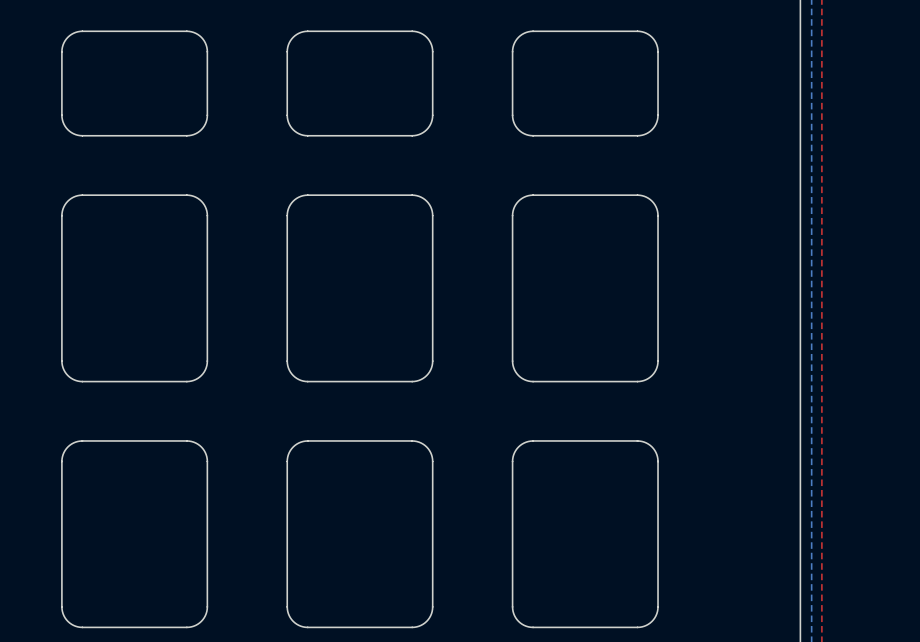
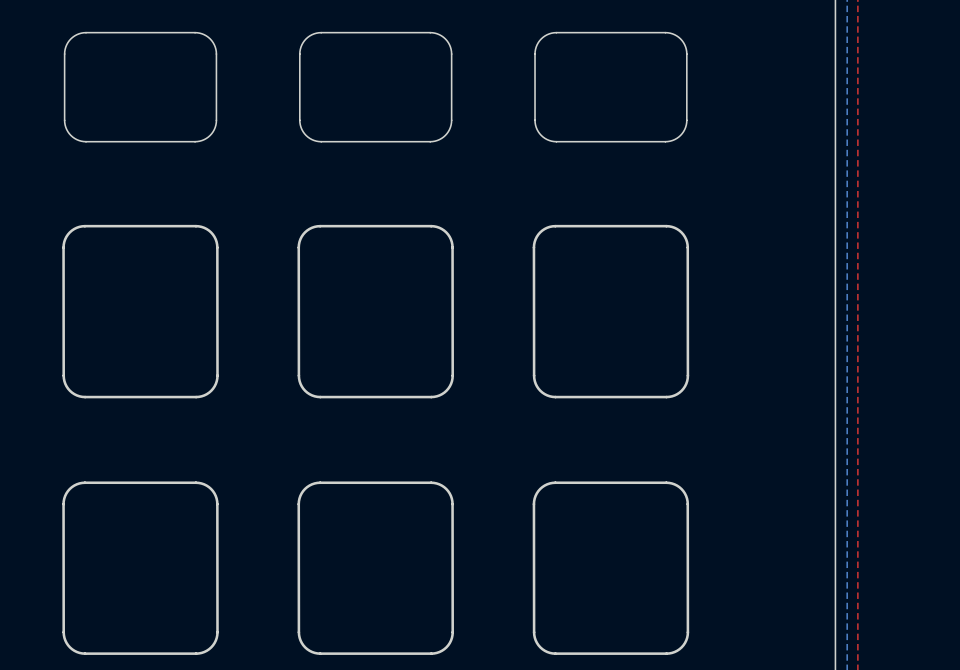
board edge: (186, 195) (80, 195) (71, 198) (65, 204) (61, 215) (61, 361) (63, 369) (71, 378) (82, 381) (186, 381) (195, 379) (204, 371) (207, 361) (207, 213) (204, 204) (199, 199) (186, 195) -> none
board edge: (412, 195) (305, 195) (296, 198) (290, 204) (287, 215) (287, 361) (290, 371) (296, 378) (307, 381) (412, 381) (423, 378) (429, 371) (432, 361) (432, 213) (426, 201) (421, 197) (412, 195) -> none
board edge: (637, 195) (530, 195) (522, 198) (515, 204) (512, 215) (512, 361) (515, 371) (522, 378) (533, 381) (637, 381) (646, 379) (654, 371) (658, 361) (657, 213) (652, 201) (646, 197) (637, 195) -> none
drawing: none -> [62, 224, 219, 399]
drawing: none -> [297, 224, 454, 399]
drawing: none -> [532, 224, 690, 399]
board edge: (186, 440) (80, 441) (71, 444) (65, 450) (61, 461) (61, 606) (63, 615) (71, 624) (82, 627) (186, 627) (197, 624) (204, 617) (207, 606) (207, 459) (204, 450) (199, 445) (186, 440) -> none
board edge: (412, 440) (305, 441) (296, 444) (290, 450) (287, 461) (287, 606) (289, 615) (296, 624) (307, 627) (412, 627) (423, 624) (429, 617) (432, 606) (432, 459) (430, 452) (424, 445) (412, 440) -> none
board edge: (637, 440) (530, 441) (522, 444) (515, 450) (512, 461) (512, 606) (514, 615) (522, 624) (533, 627) (637, 627) (648, 624) (654, 617) (658, 606) (657, 459) (652, 446) (646, 443) (637, 440) -> none
drawing: none -> [62, 481, 219, 655]
drawing: none -> [297, 481, 454, 655]
drawing: none -> [532, 481, 690, 655]

